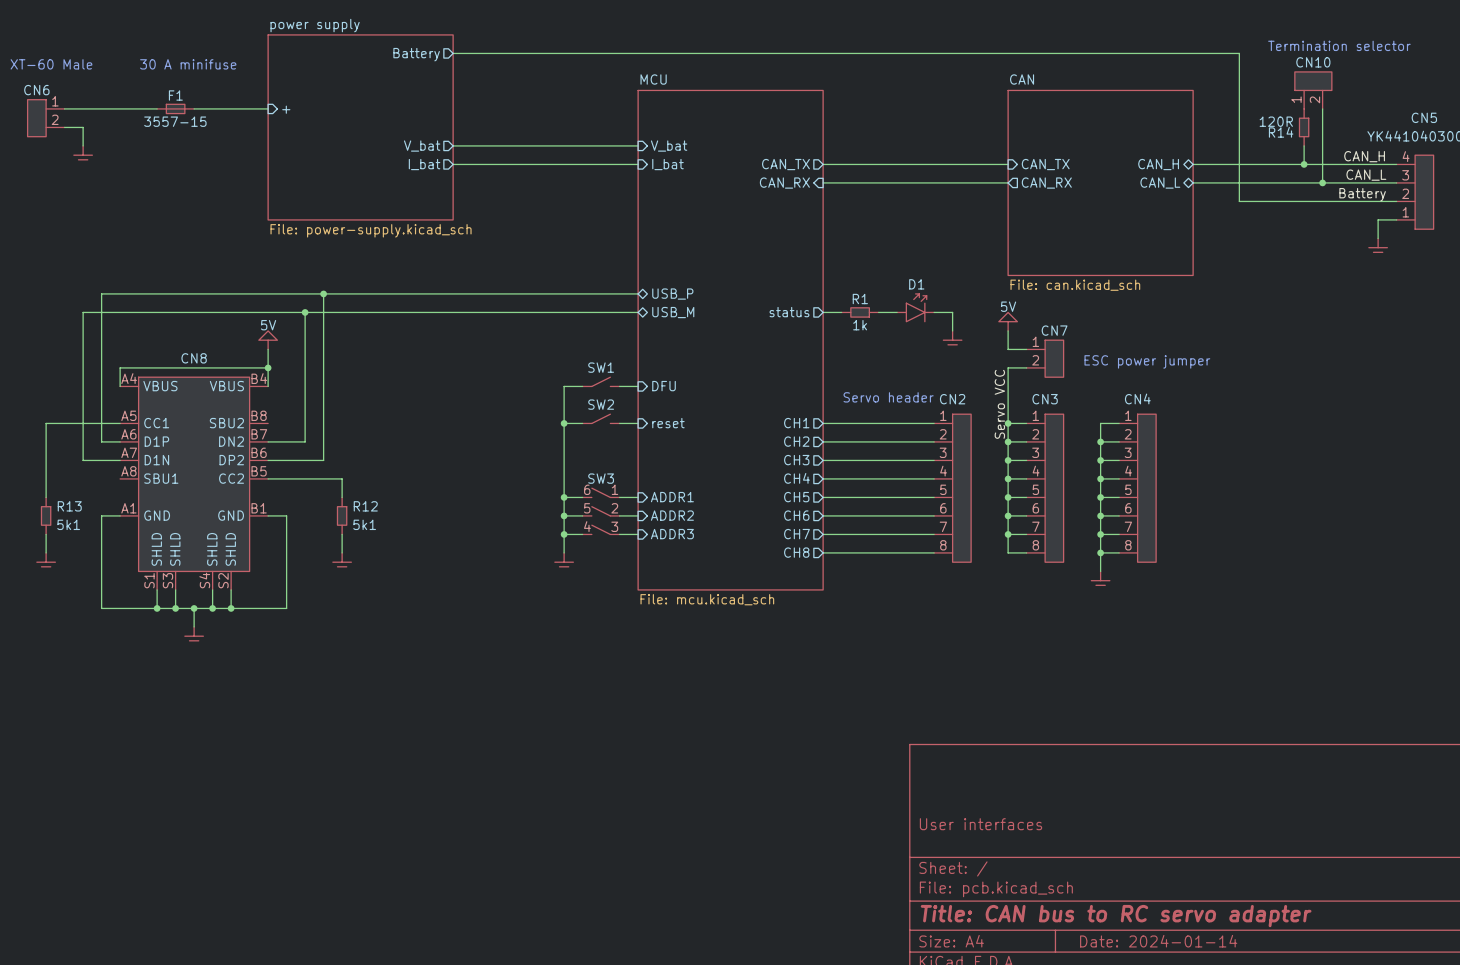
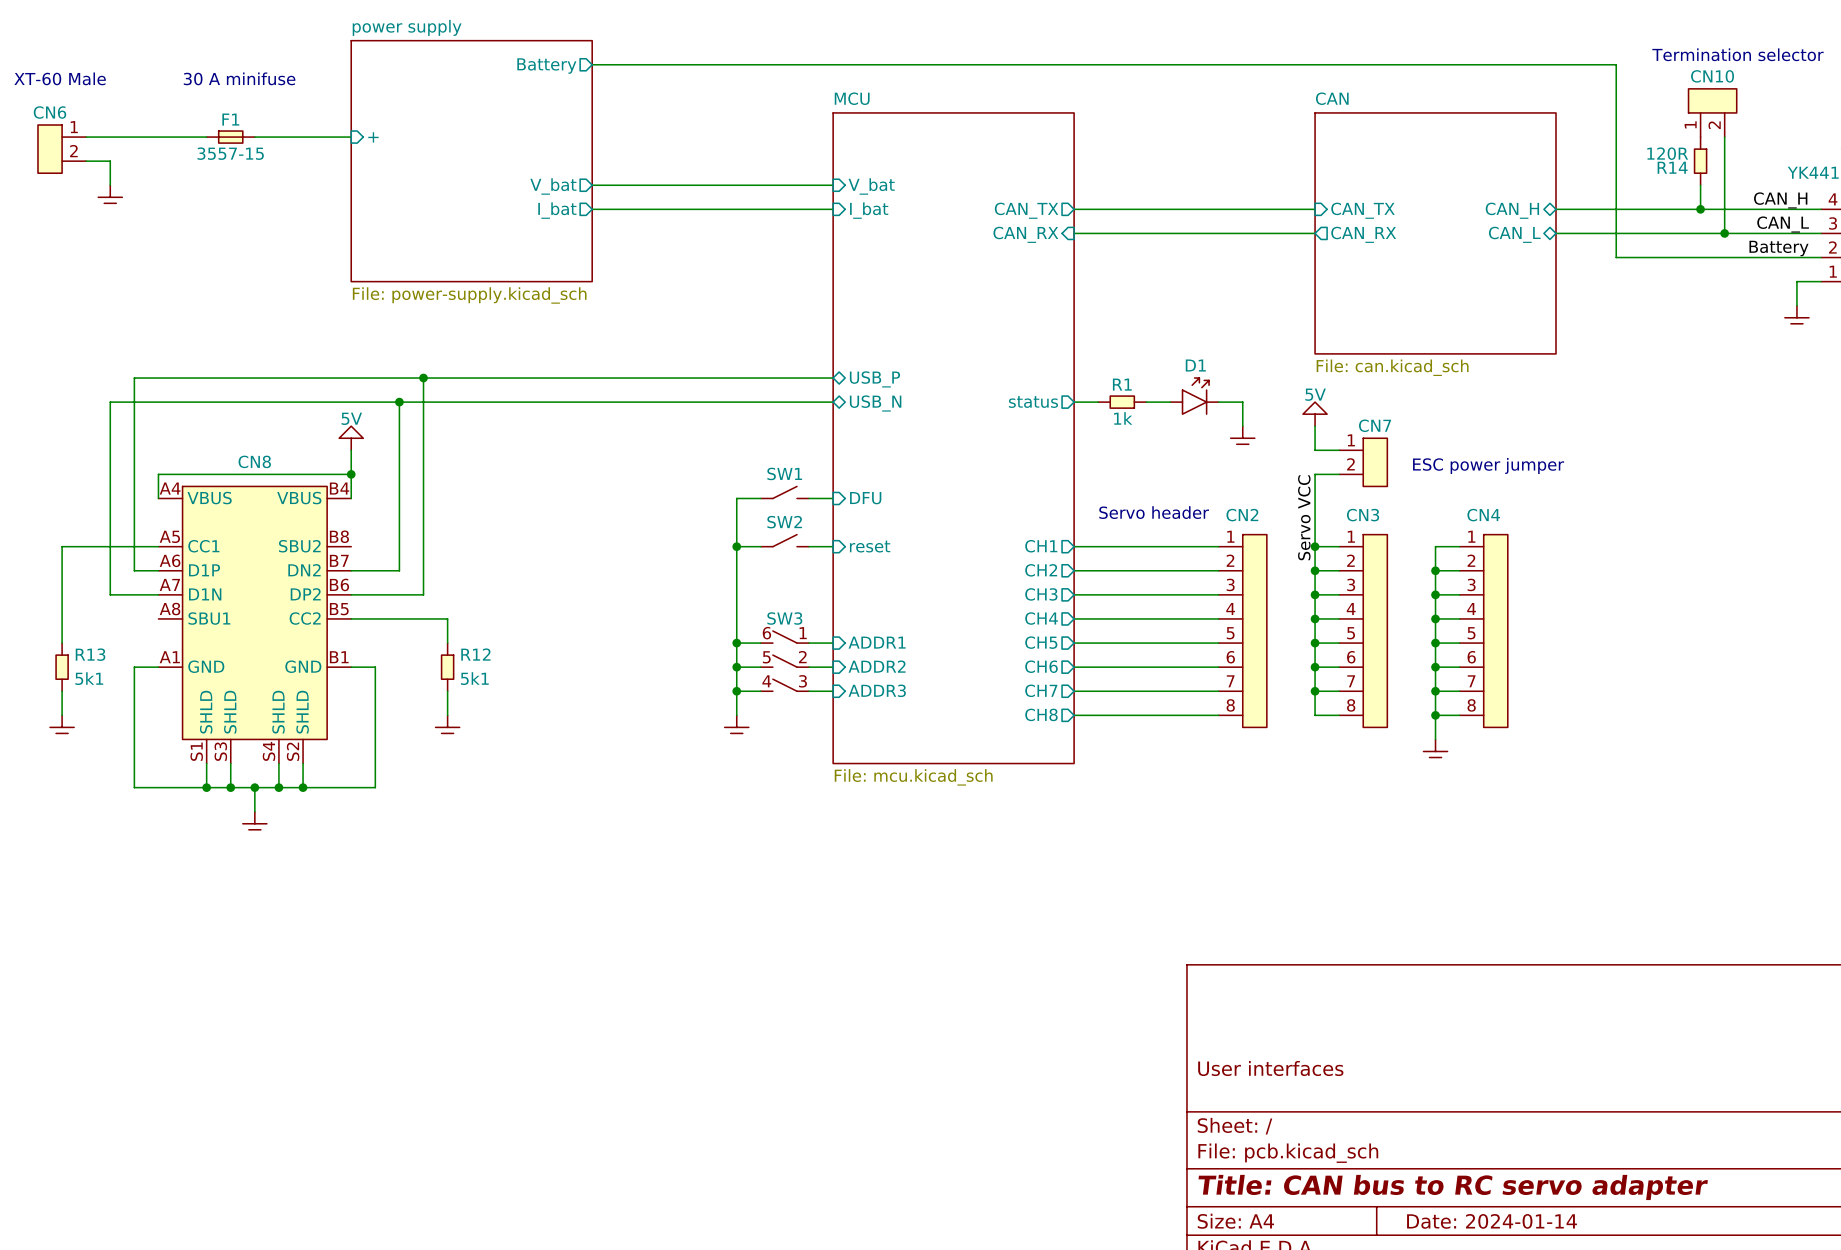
sheet pin: USB_M (673, 312) -> USB_N (875, 403)

